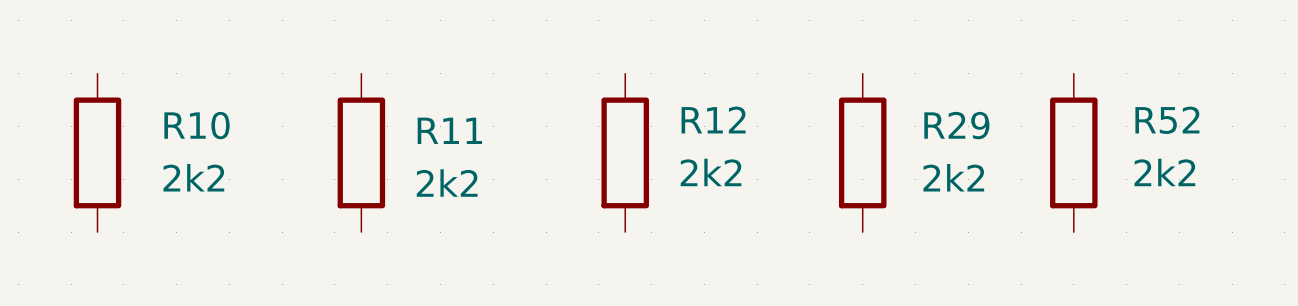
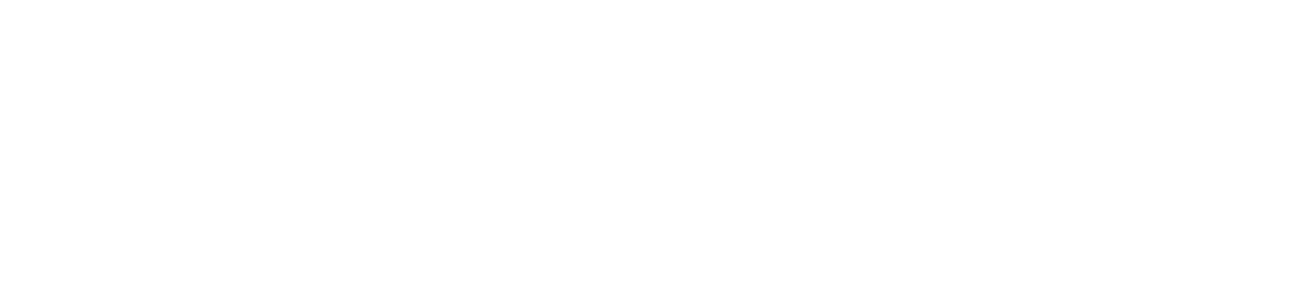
R10: 2k2 (97, 152) -> none
R11: 2k2 (361, 152) -> none
R12: 2k2 (625, 152) -> none
R29: 2k2 (862, 152) -> none
R52: 2k2 (1073, 152) -> none

